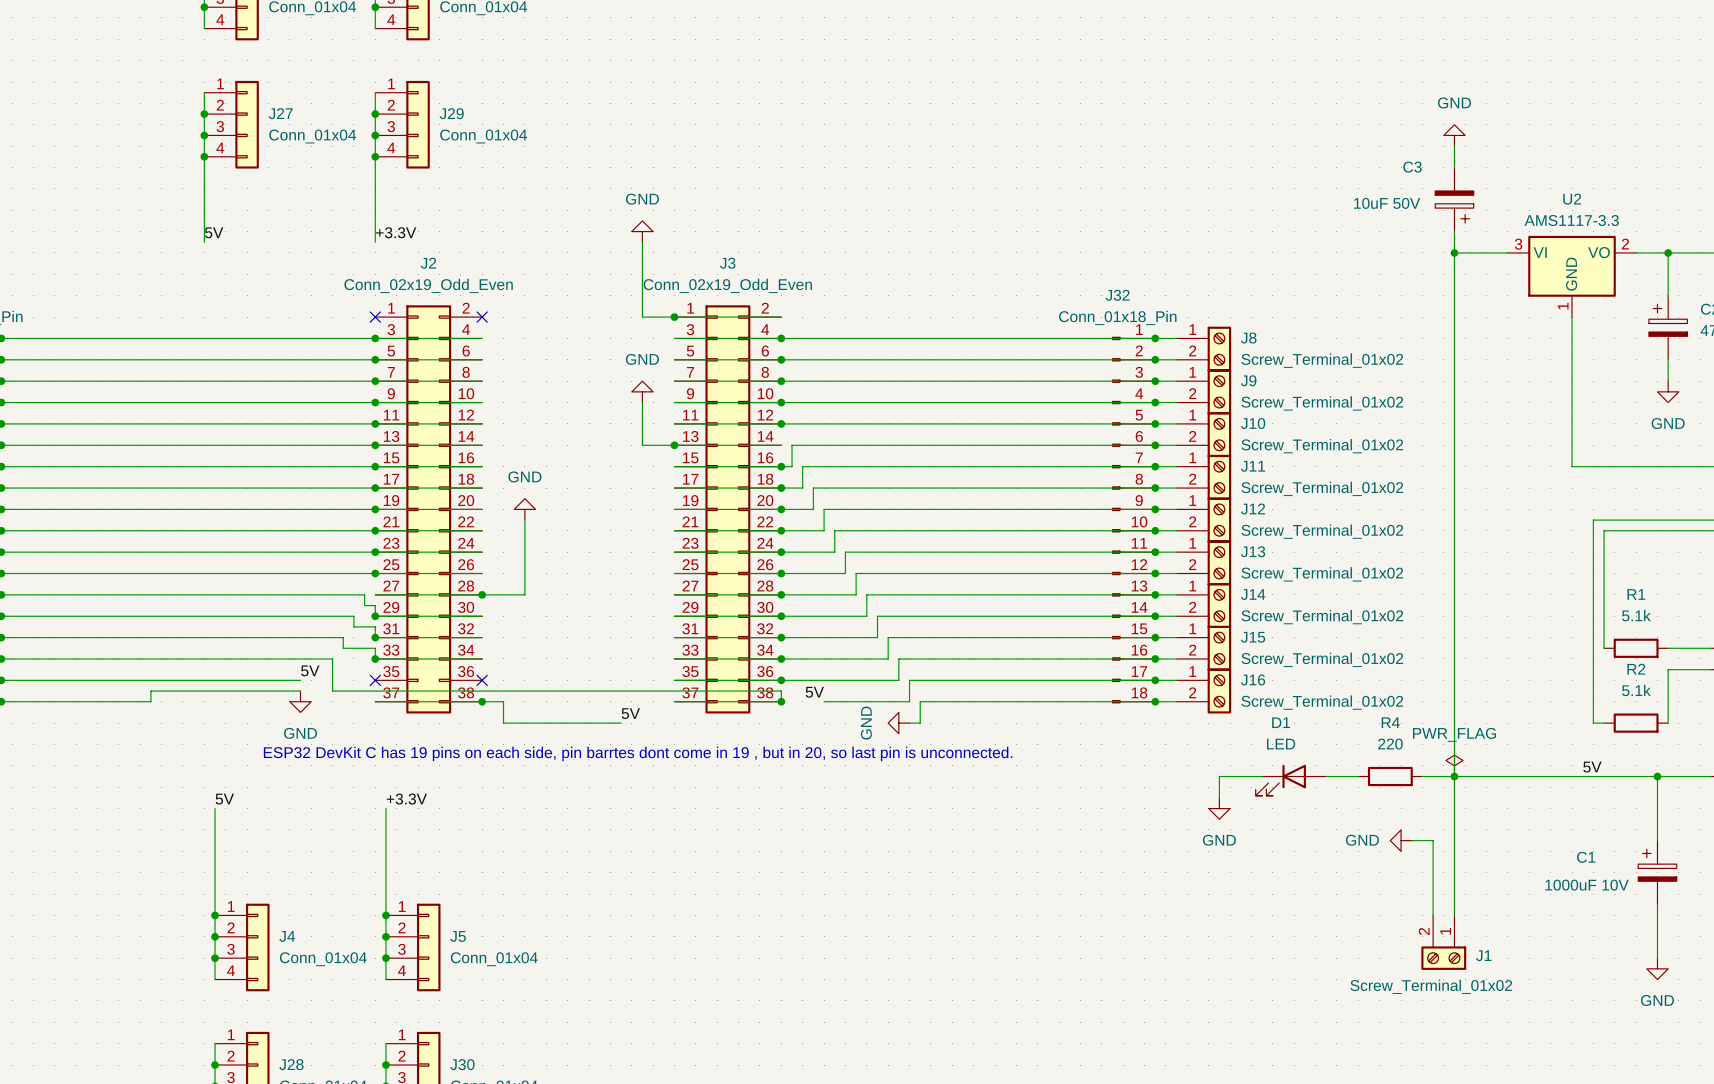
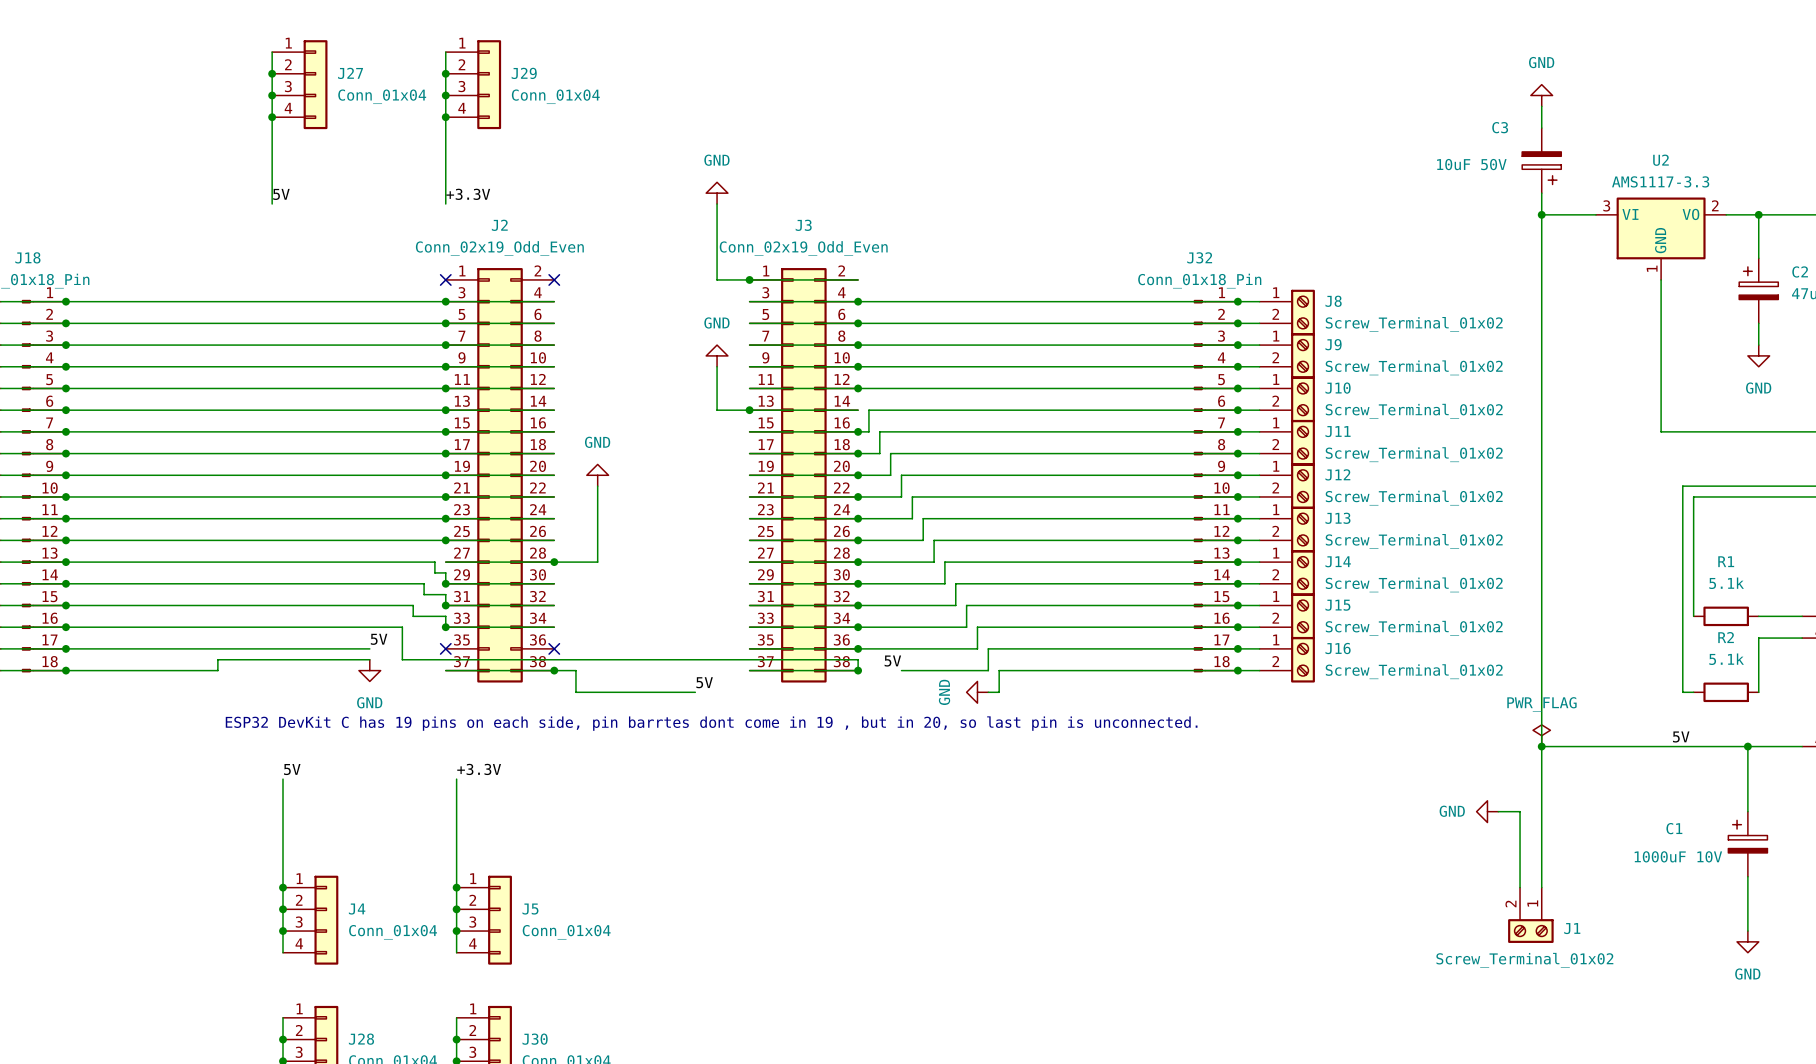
wire: (1262, 776) (1219, 776) (1219, 797) -> none
wire: (1326, 776) (1358, 776) -> none
R4: 220 (1390, 776) -> none
wire: (1422, 776) (1454, 776) -> none
D1: LED (1290, 780) -> none
power symbol: GND (1219, 808) -> none

